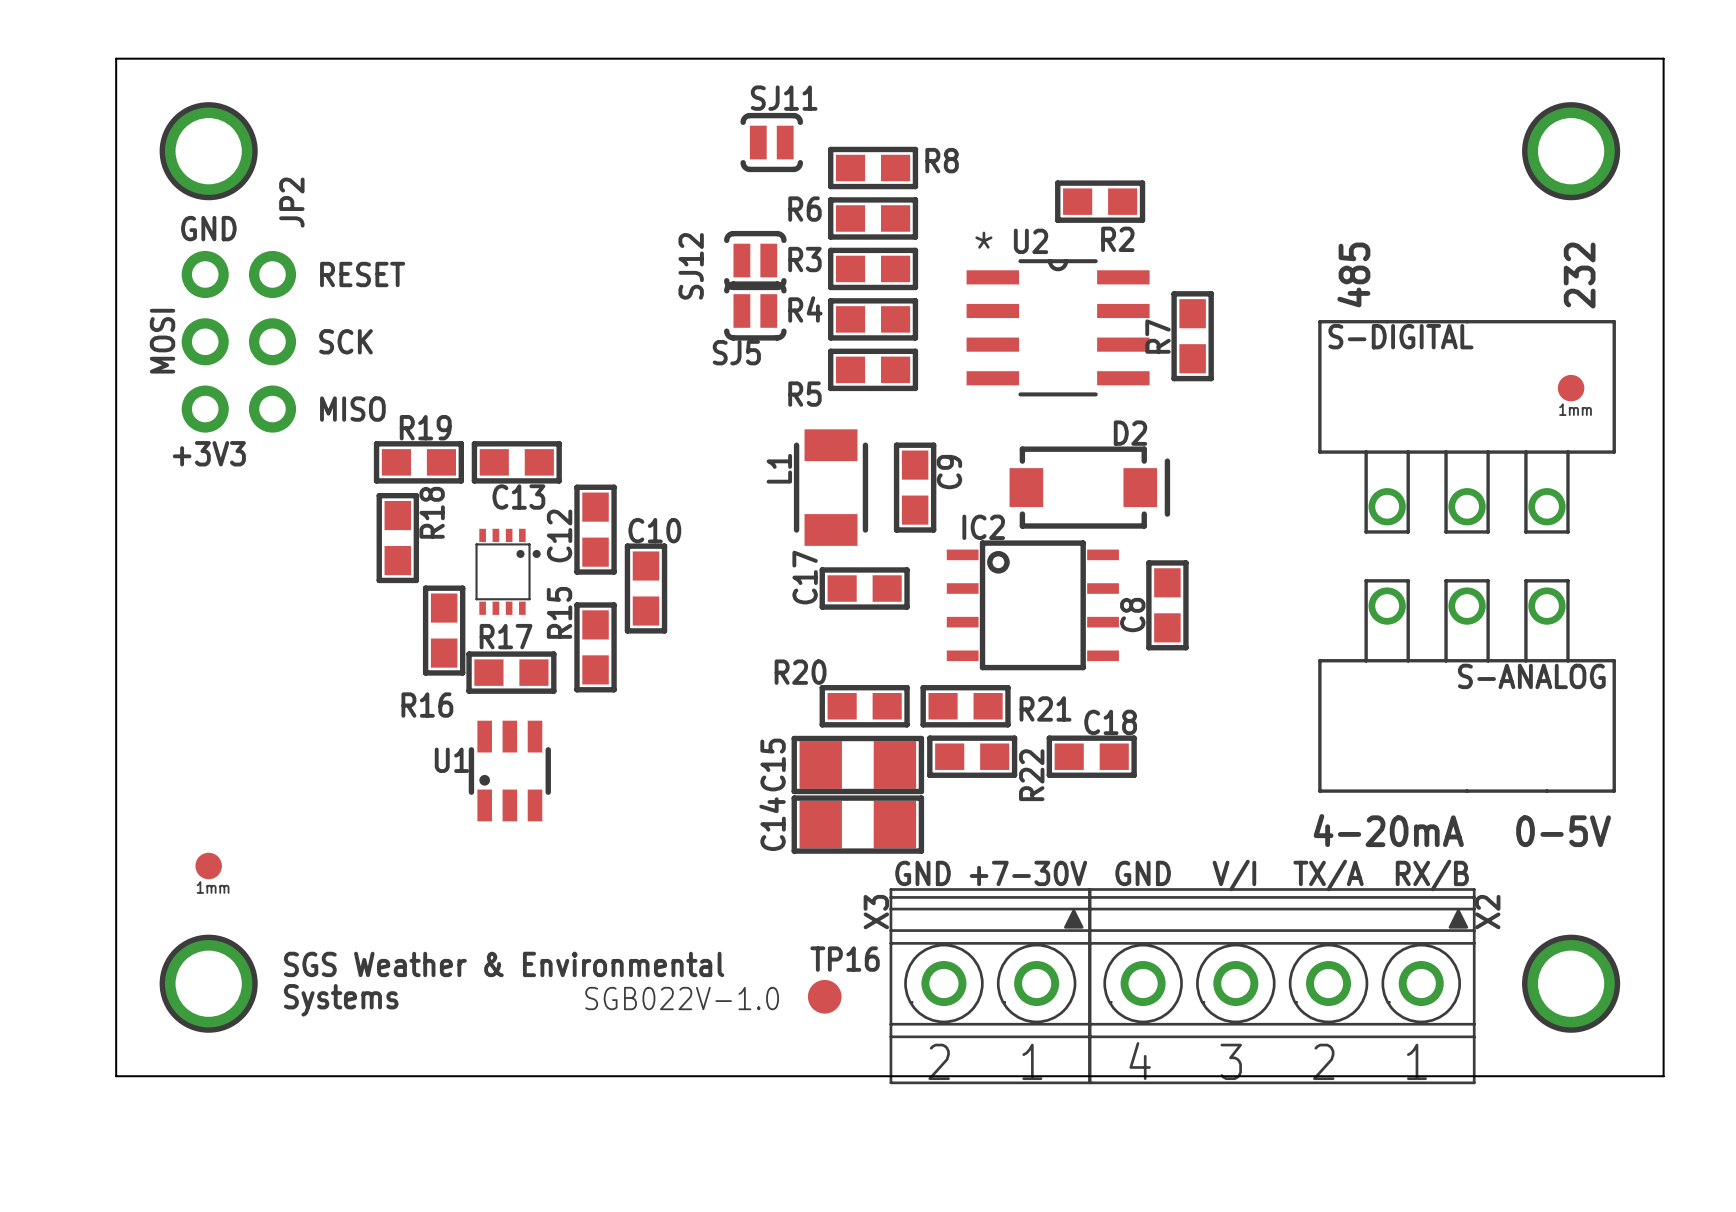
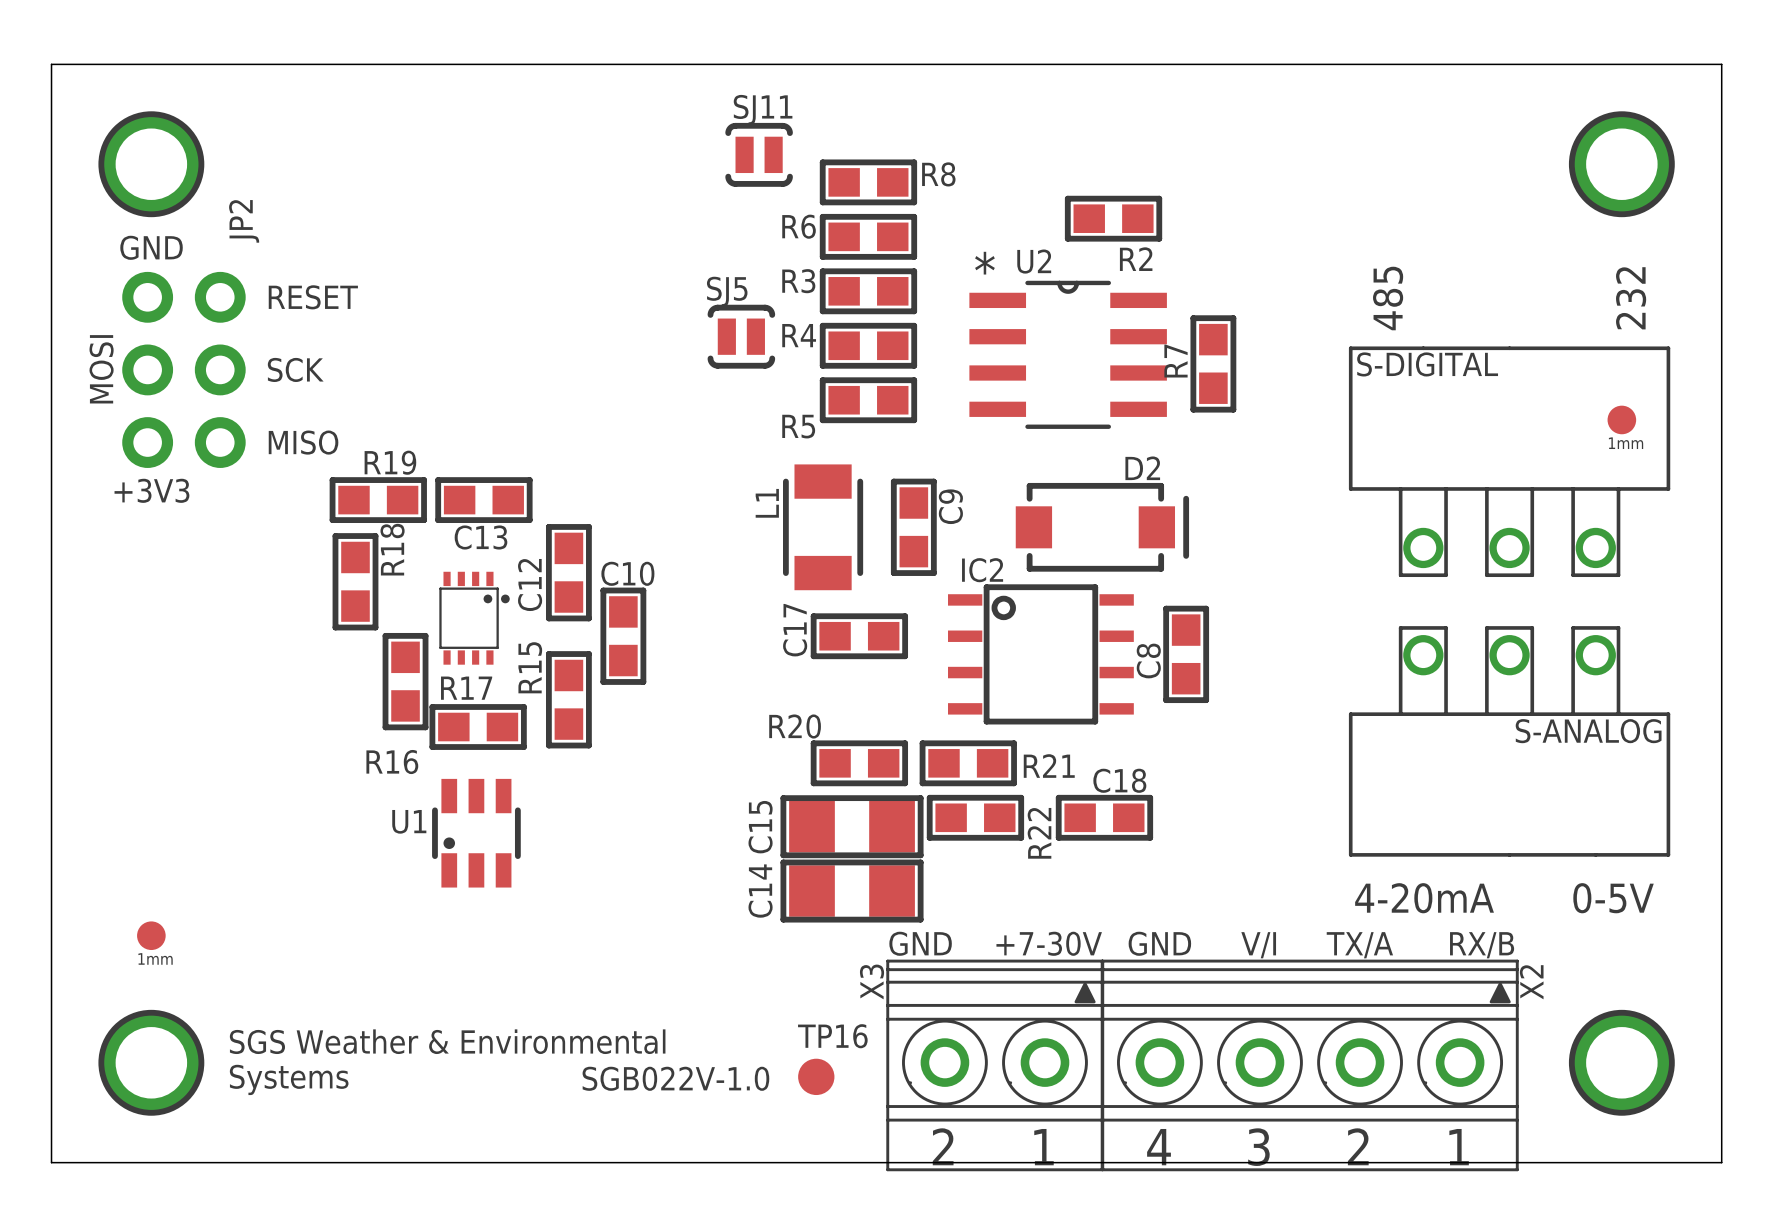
SJ12: (755, 260) -> none
SJ5 name position: SJ5 (736, 352) -> SJ5 (727, 291)

